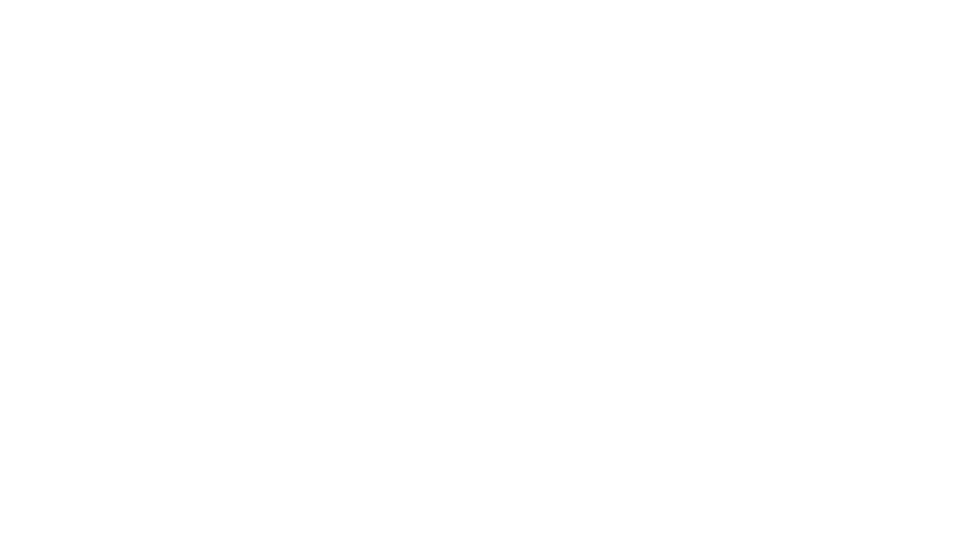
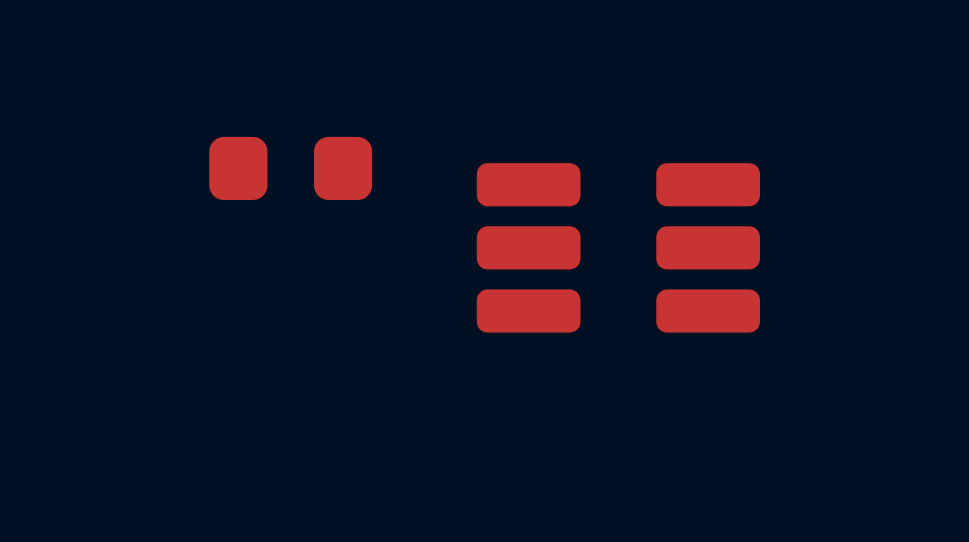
part: none -> (290, 168)
part: none -> (618, 247)

